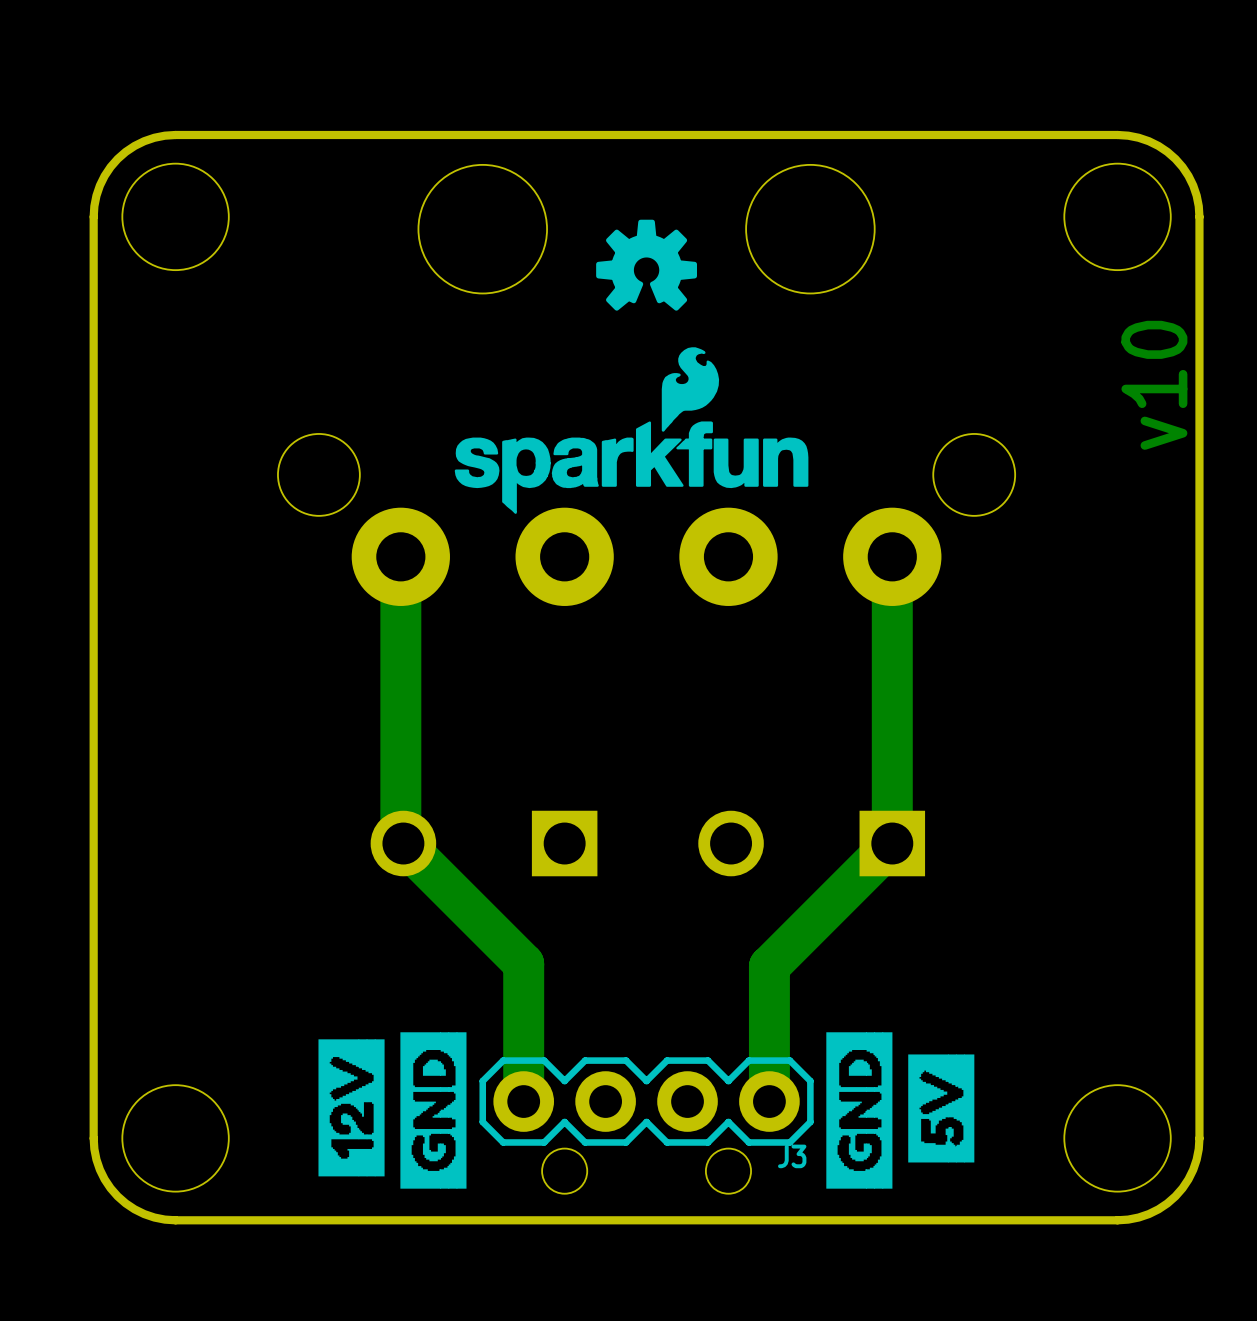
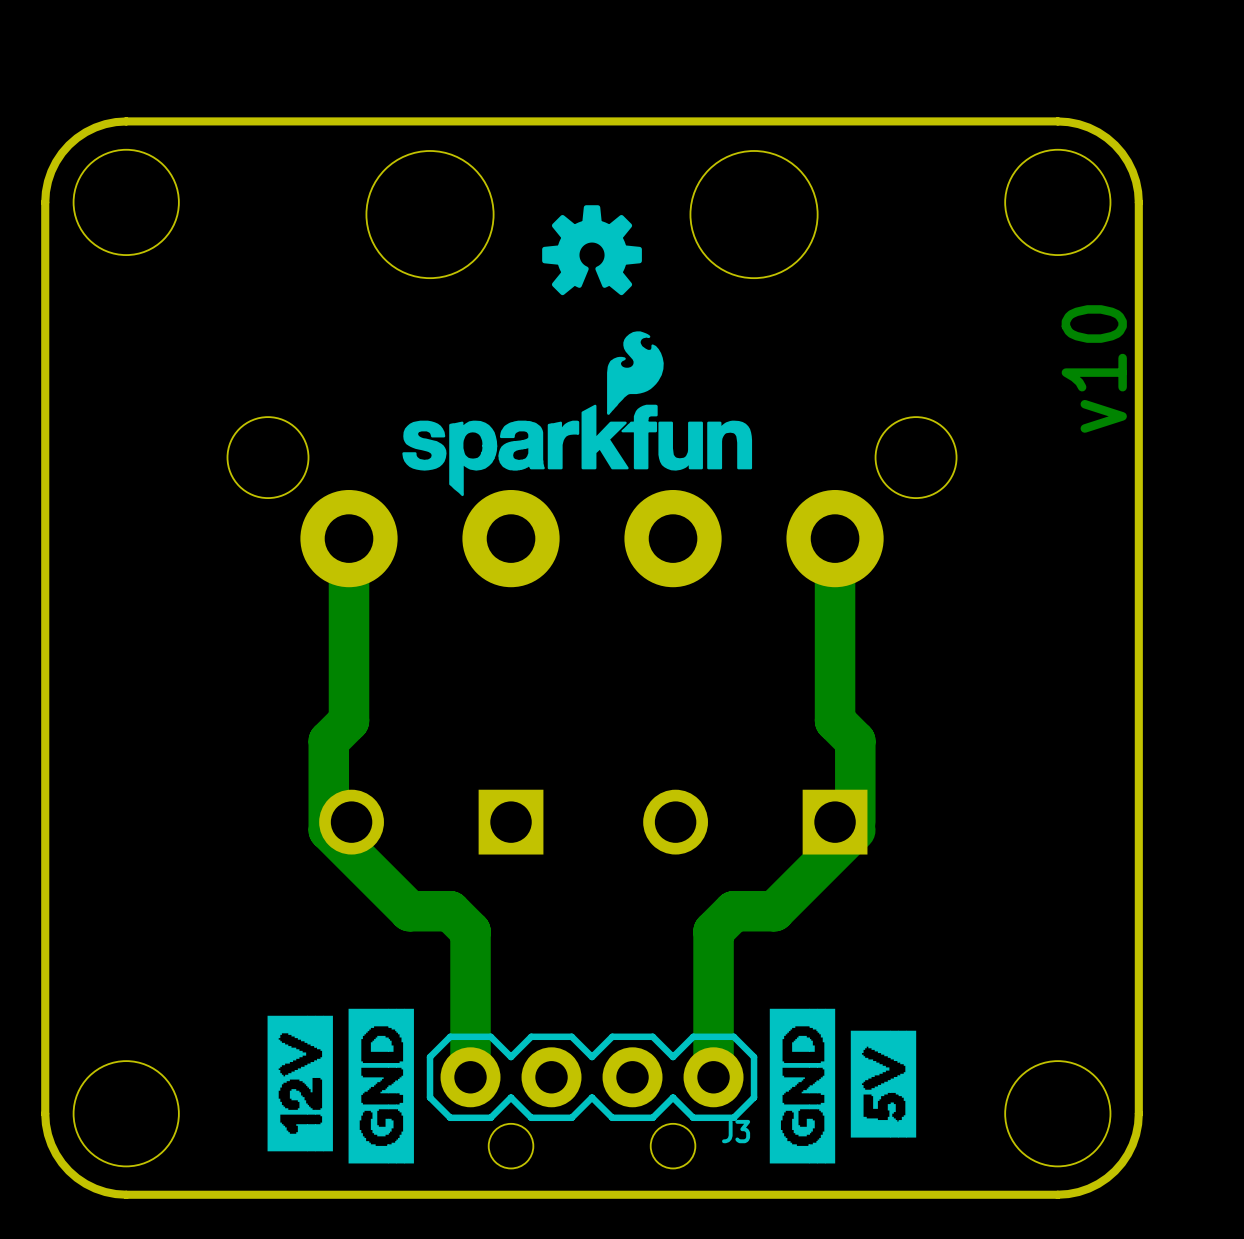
track: (400, 741) (400, 839) (404, 843) -> none
track: (892, 741) (892, 843) (769, 966) -> (855, 830) (774, 911) (733, 911) (713, 931) (713, 943)
track: none -> (835, 720) (855, 741) (855, 822)
track: (403, 843) (523, 963) -> (349, 720) (328, 741) (328, 830) (409, 911) (450, 911) (470, 931) (470, 941)

